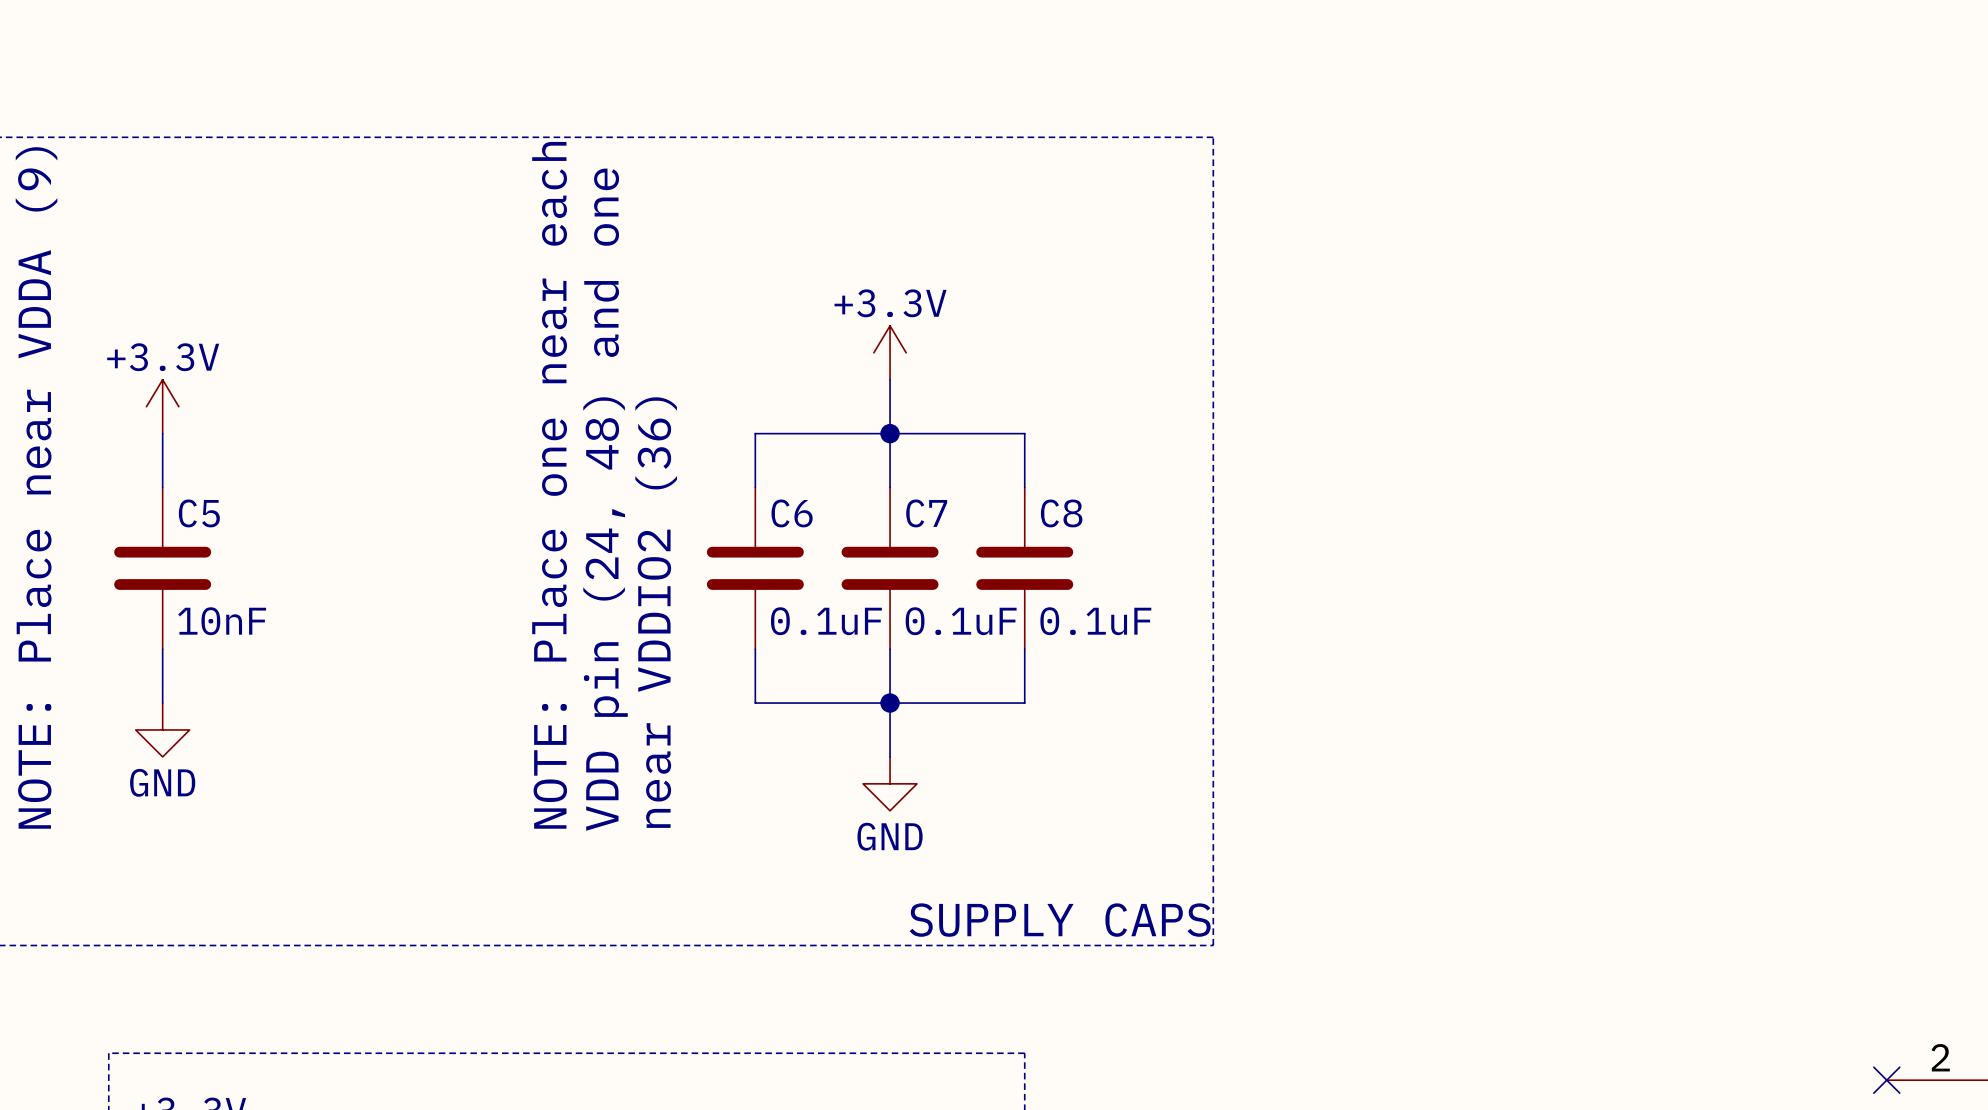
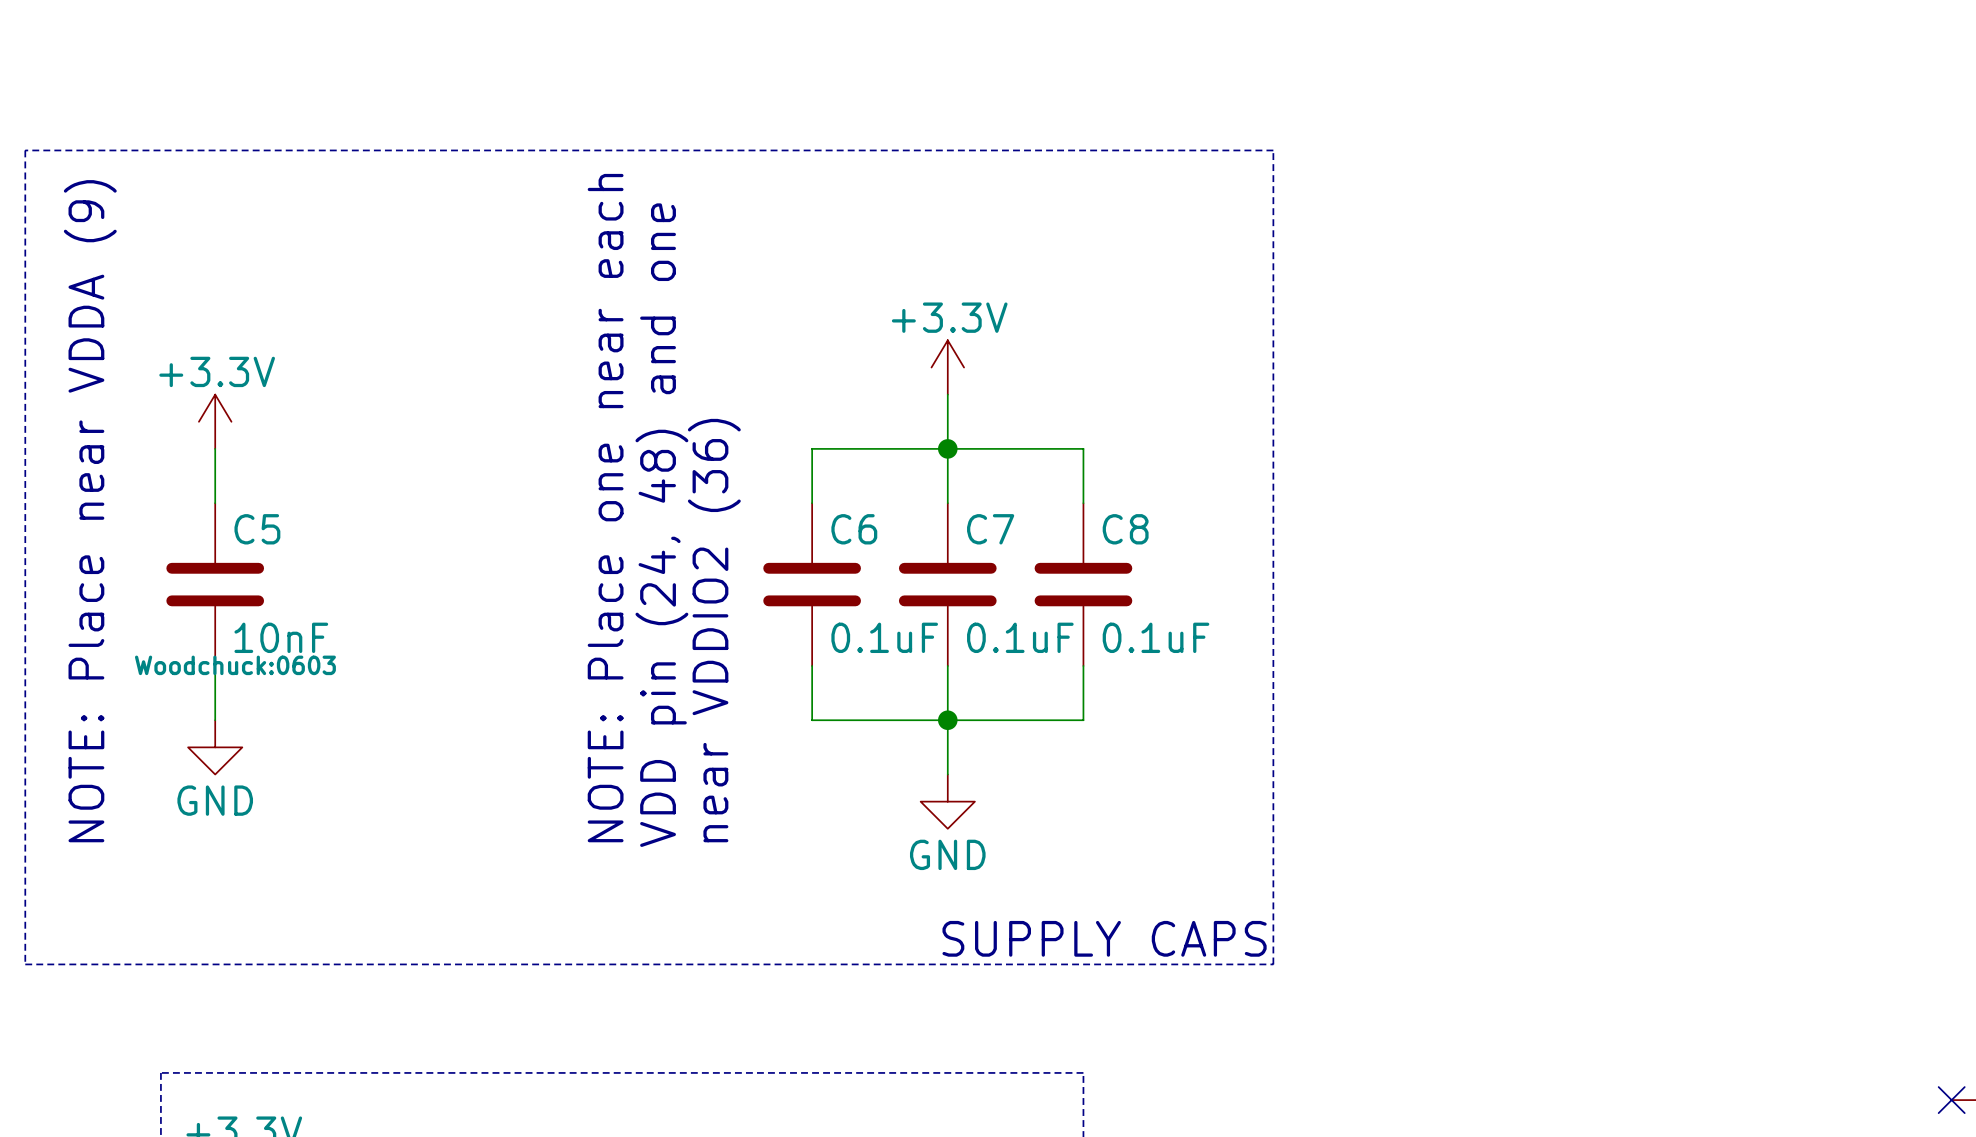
C5 text: none -> Woodchuck:0603 (235, 665)

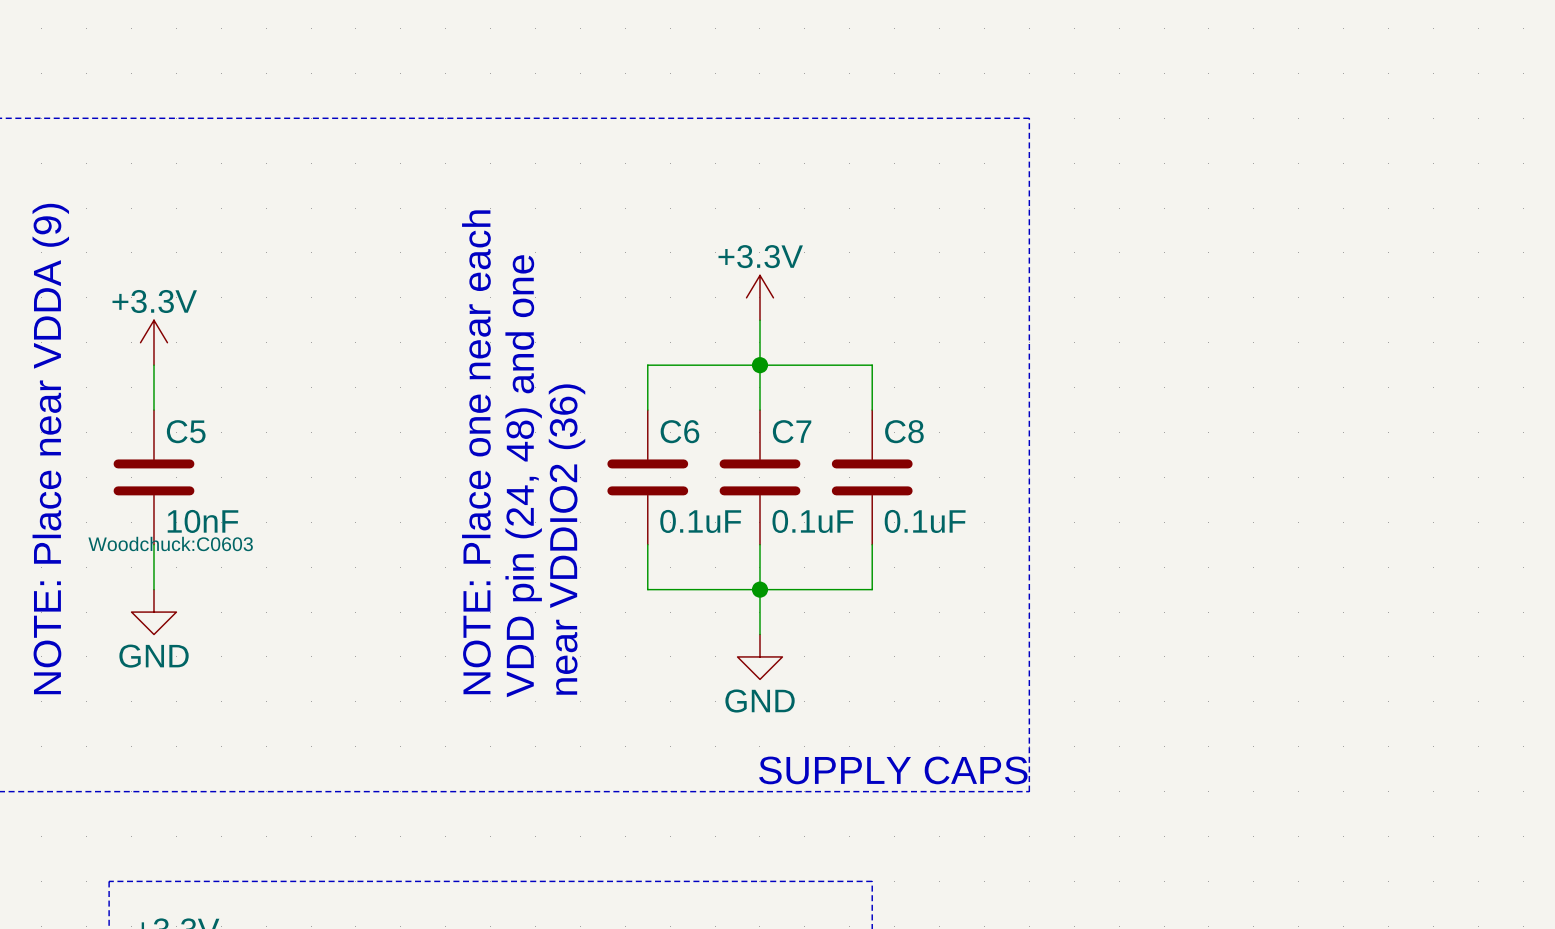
C5 text: Woodchuck:0603 (235, 665) -> Woodchuck:C0603 (170, 543)

